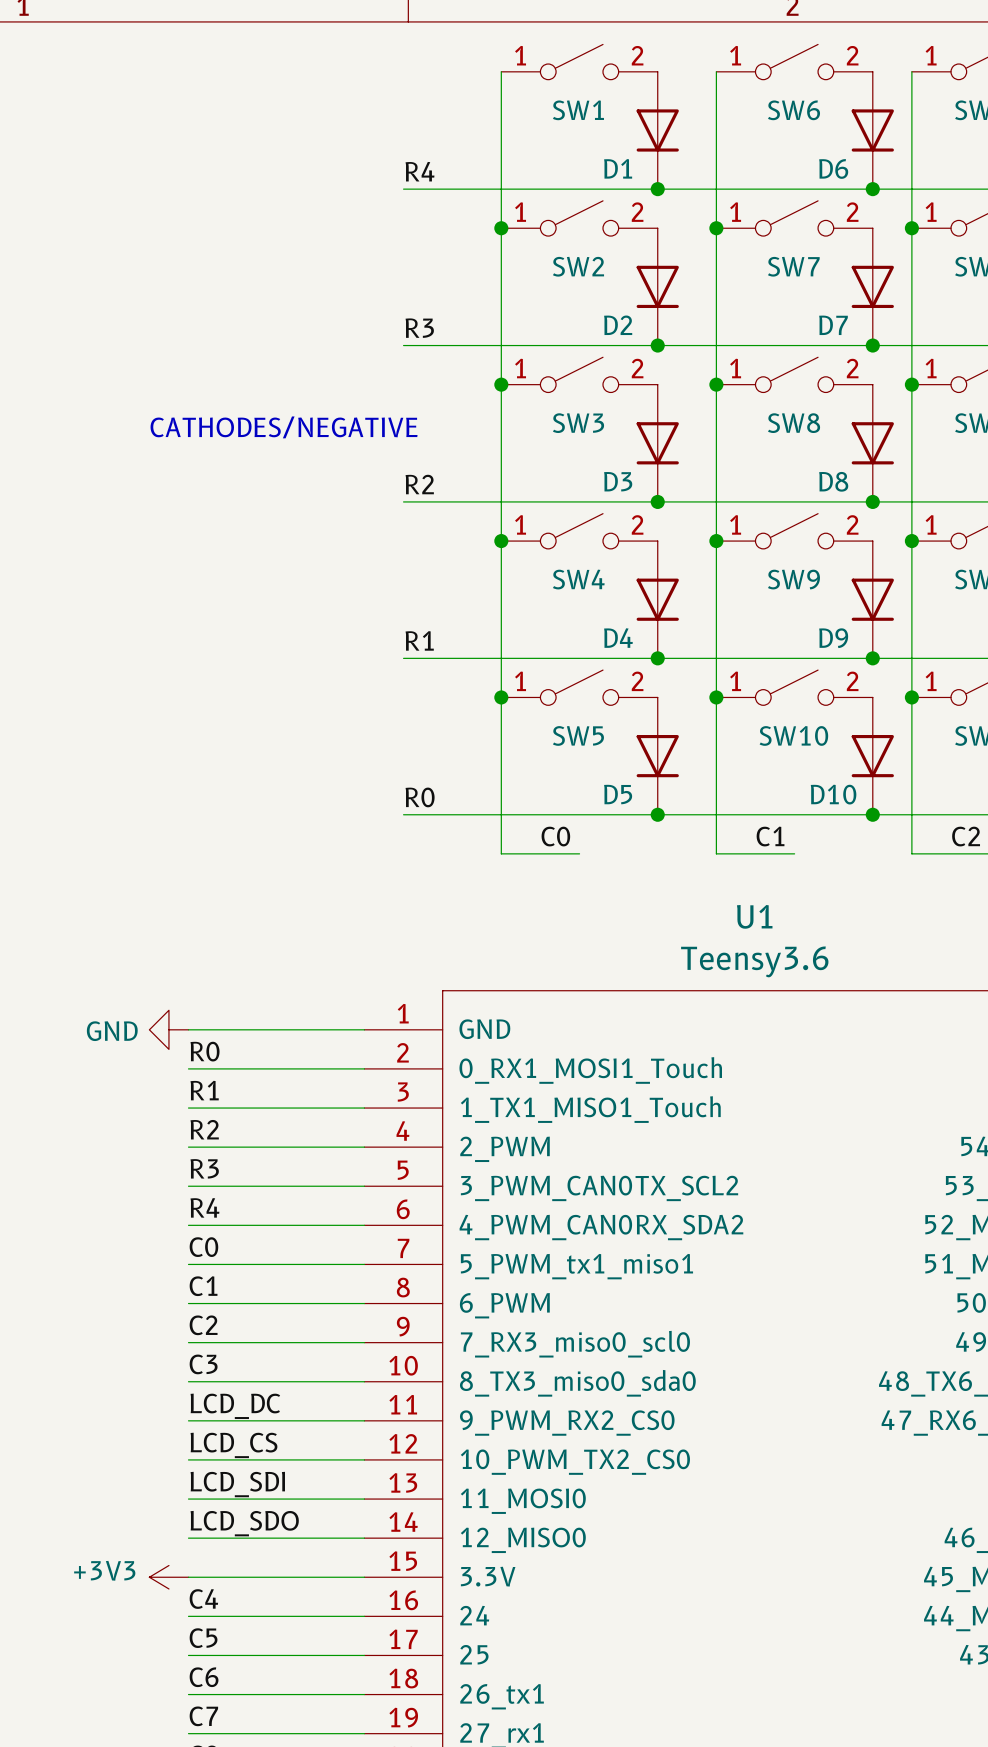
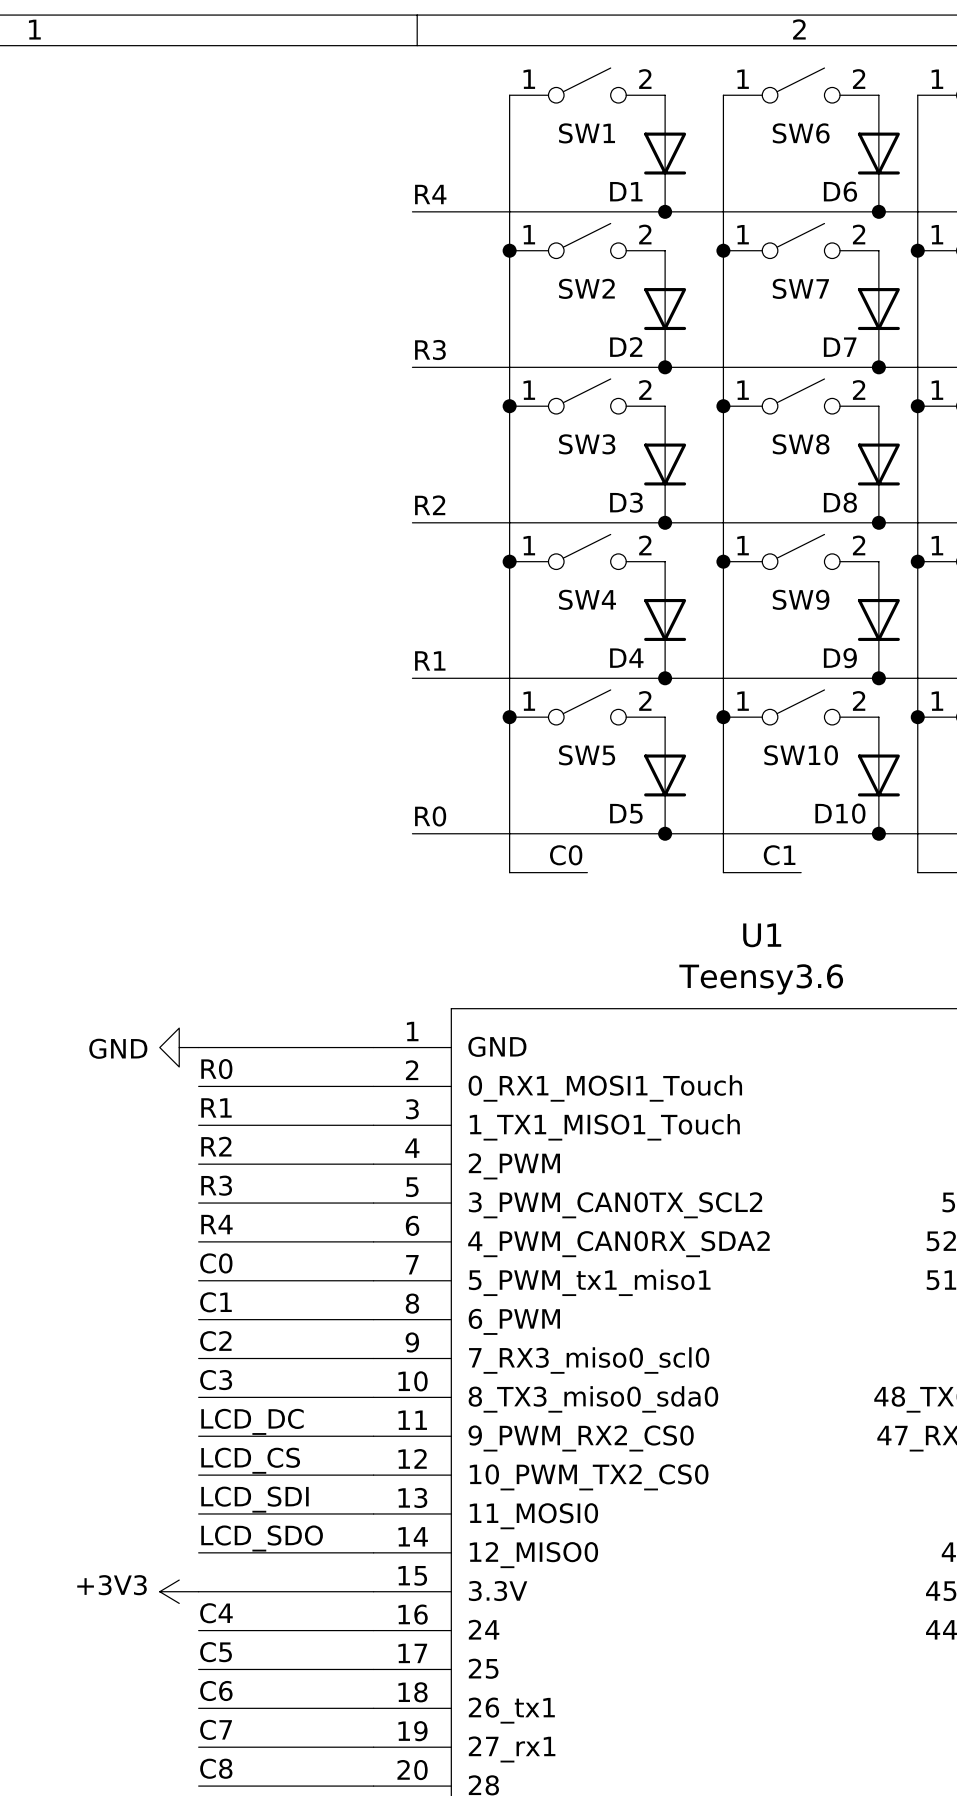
text: CATHODES/NEGATIVE (284, 427) -> none

